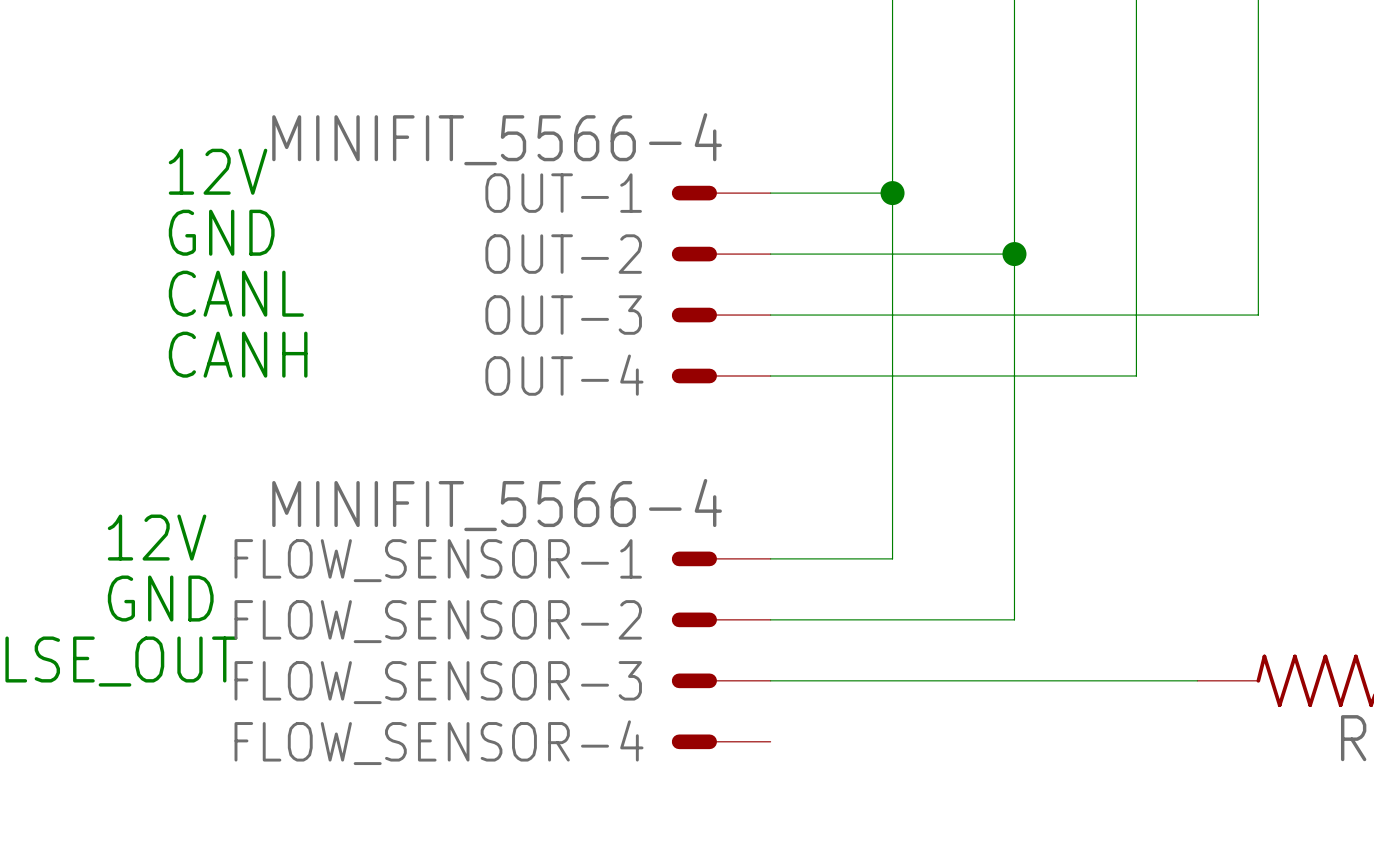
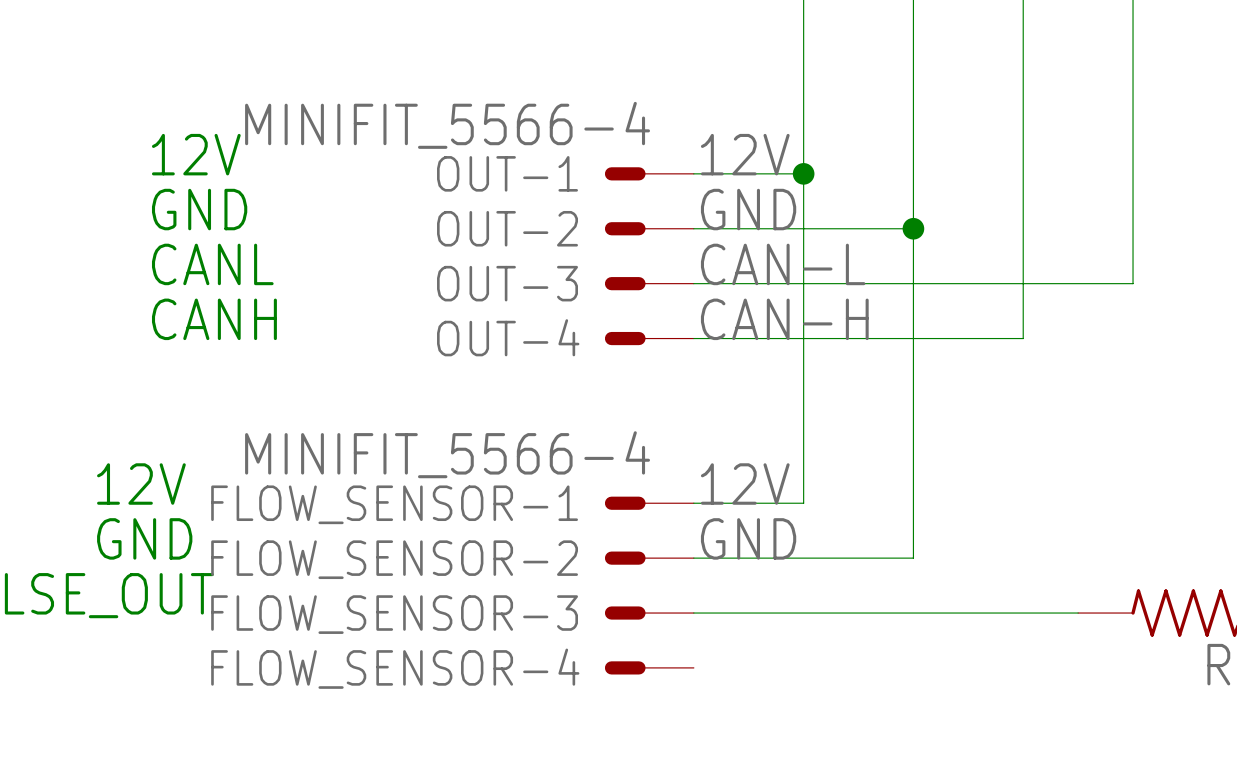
label: none -> 12V (745, 154)
label: none -> GND (748, 209)
label: none -> CAN-L (783, 264)
label: none -> CAN-H (784, 319)
label: none -> 12V (745, 484)
label: none -> GND (748, 538)

